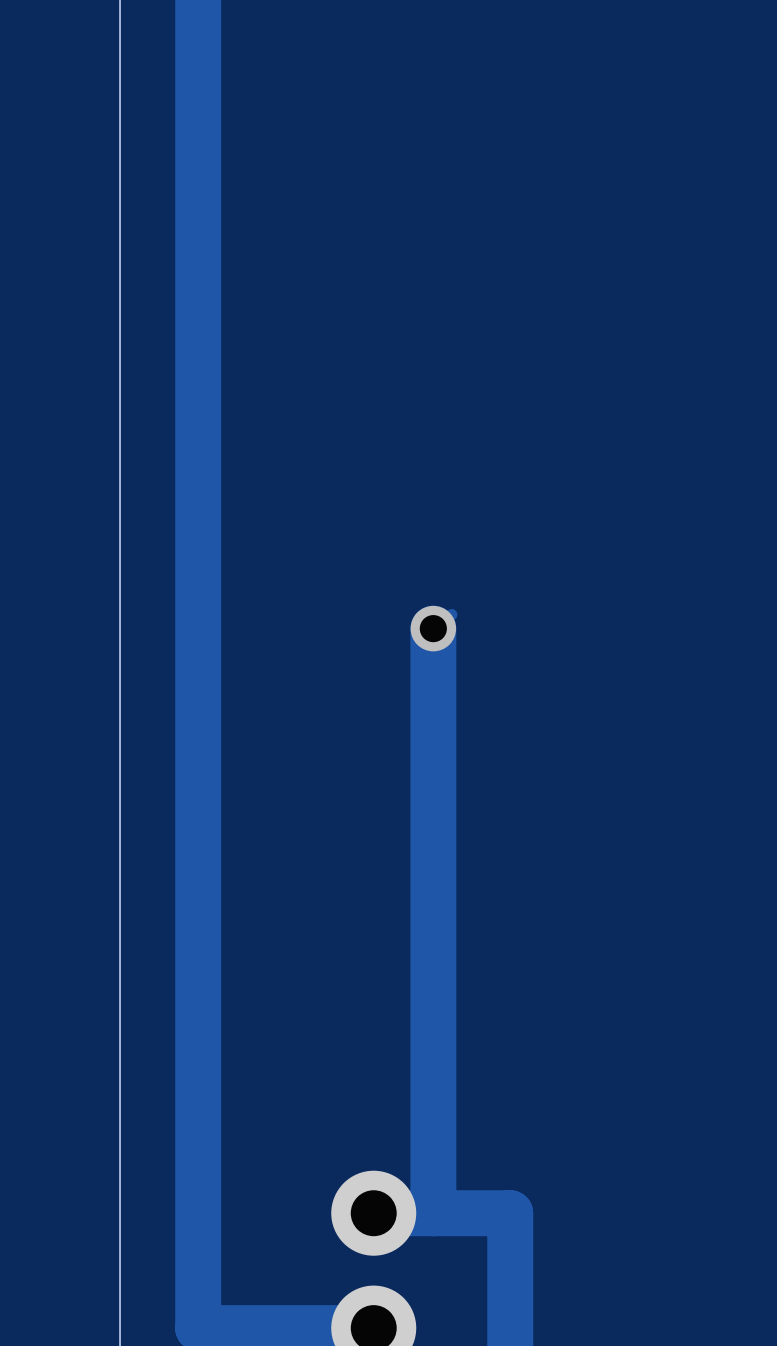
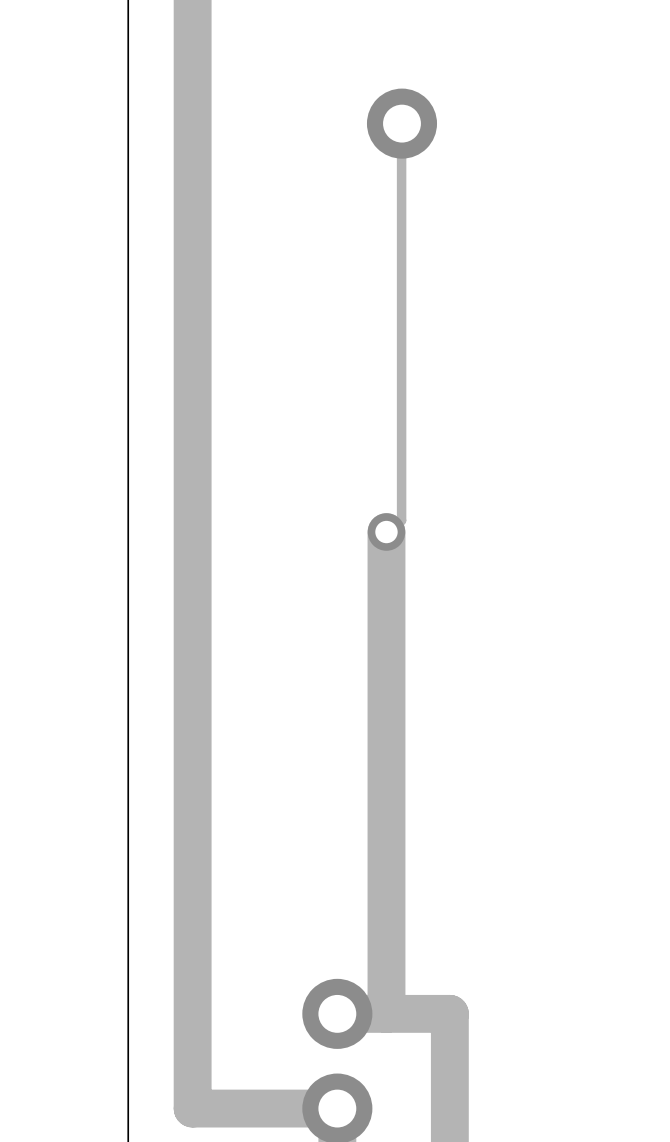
track: none -> (401, 123) (401, 520)
part: none -> (401, 123)

